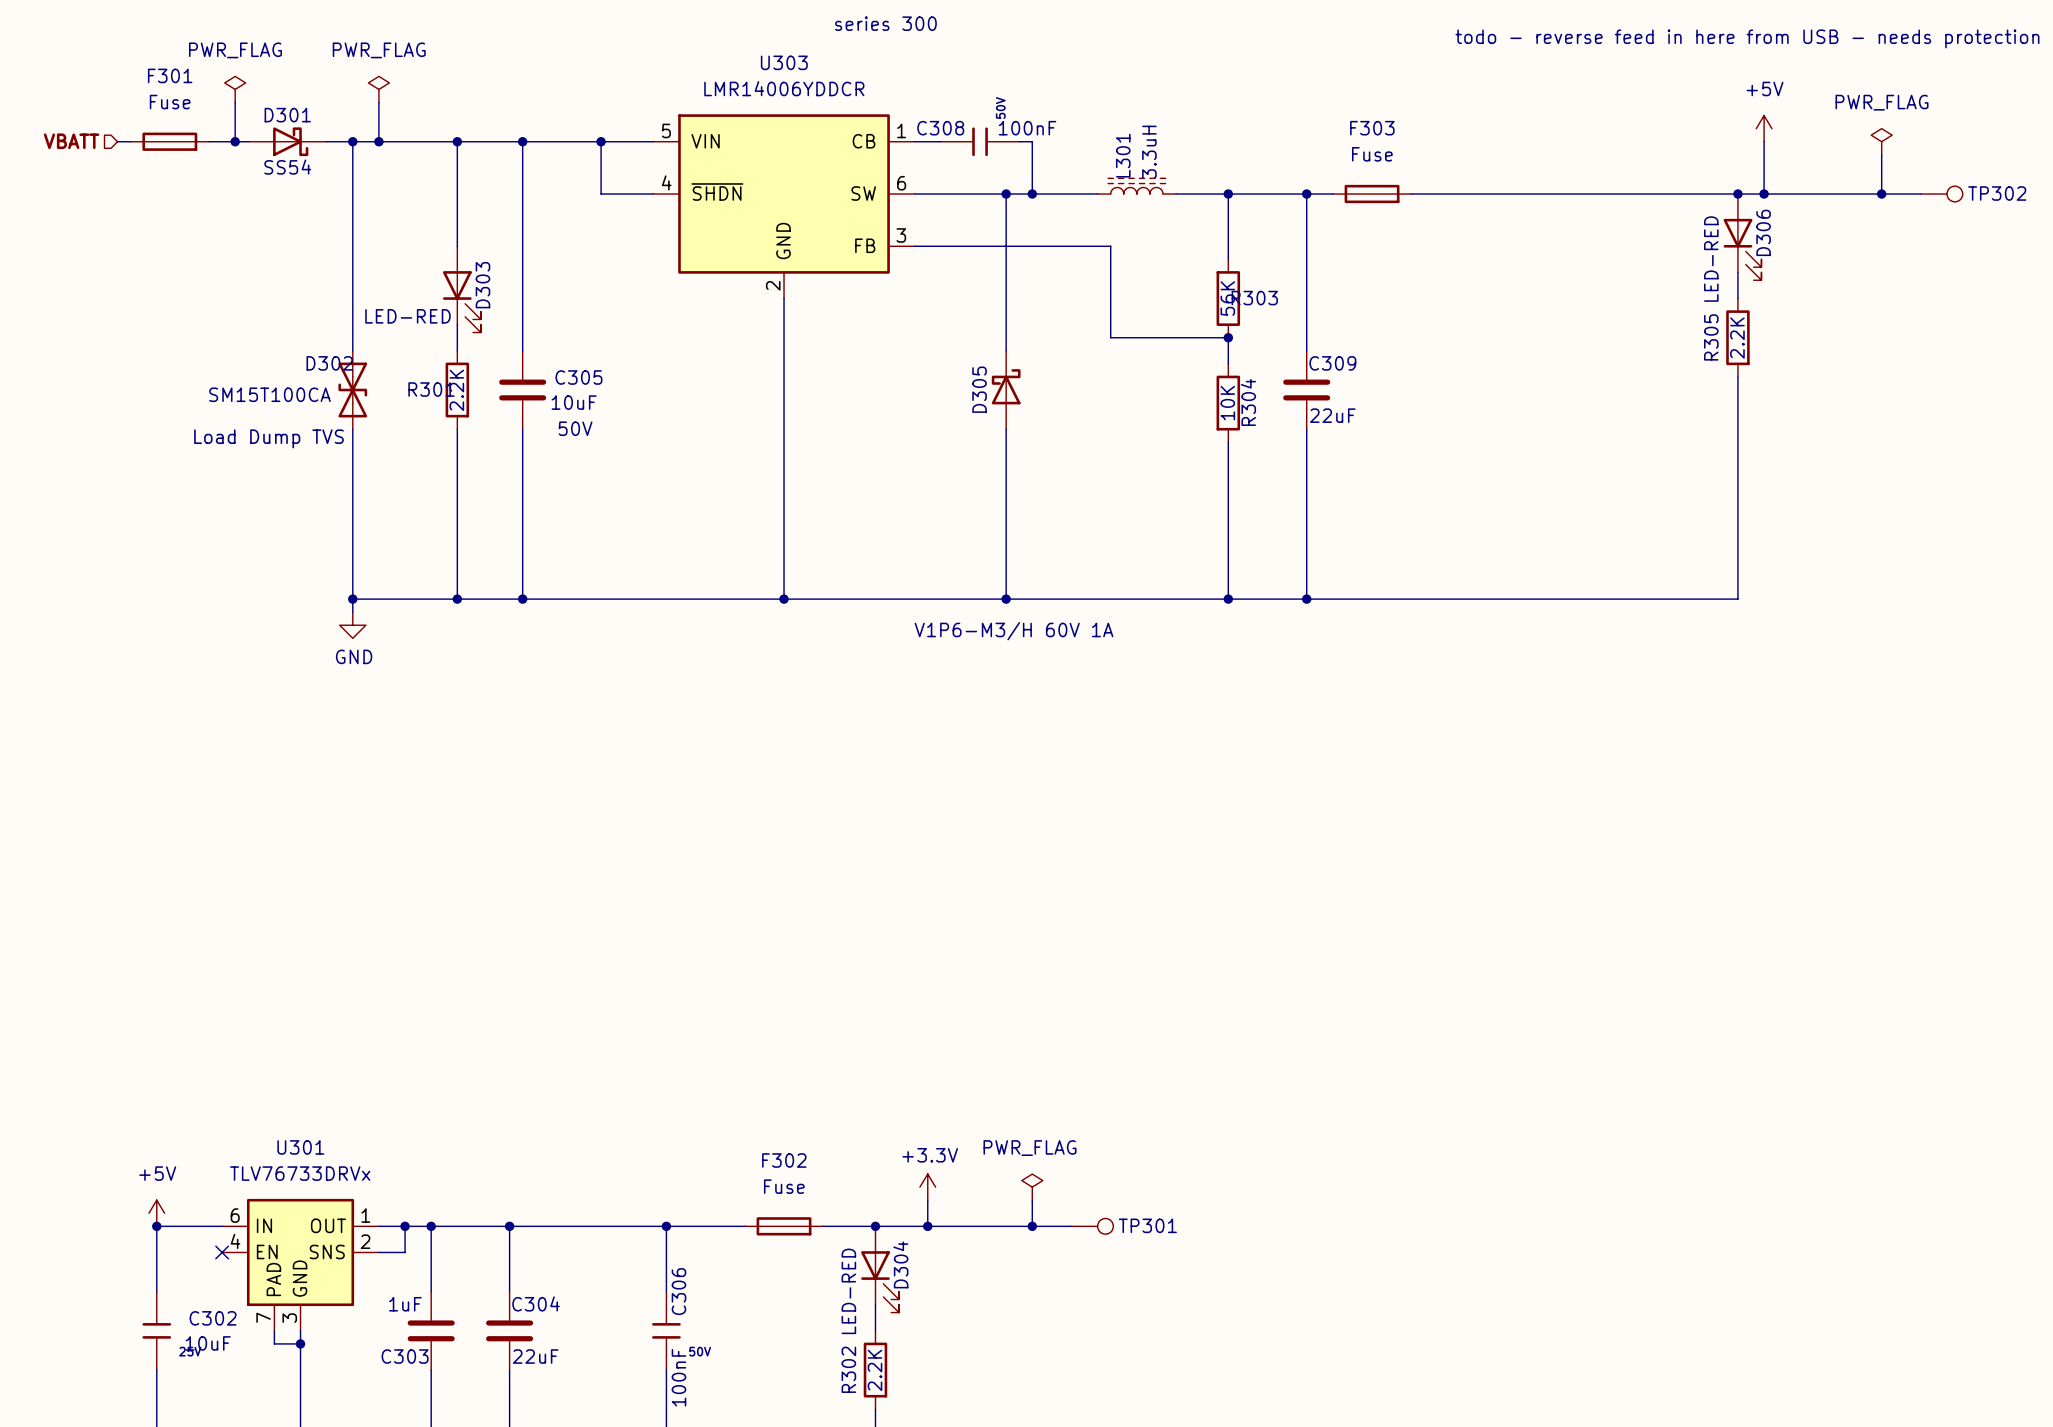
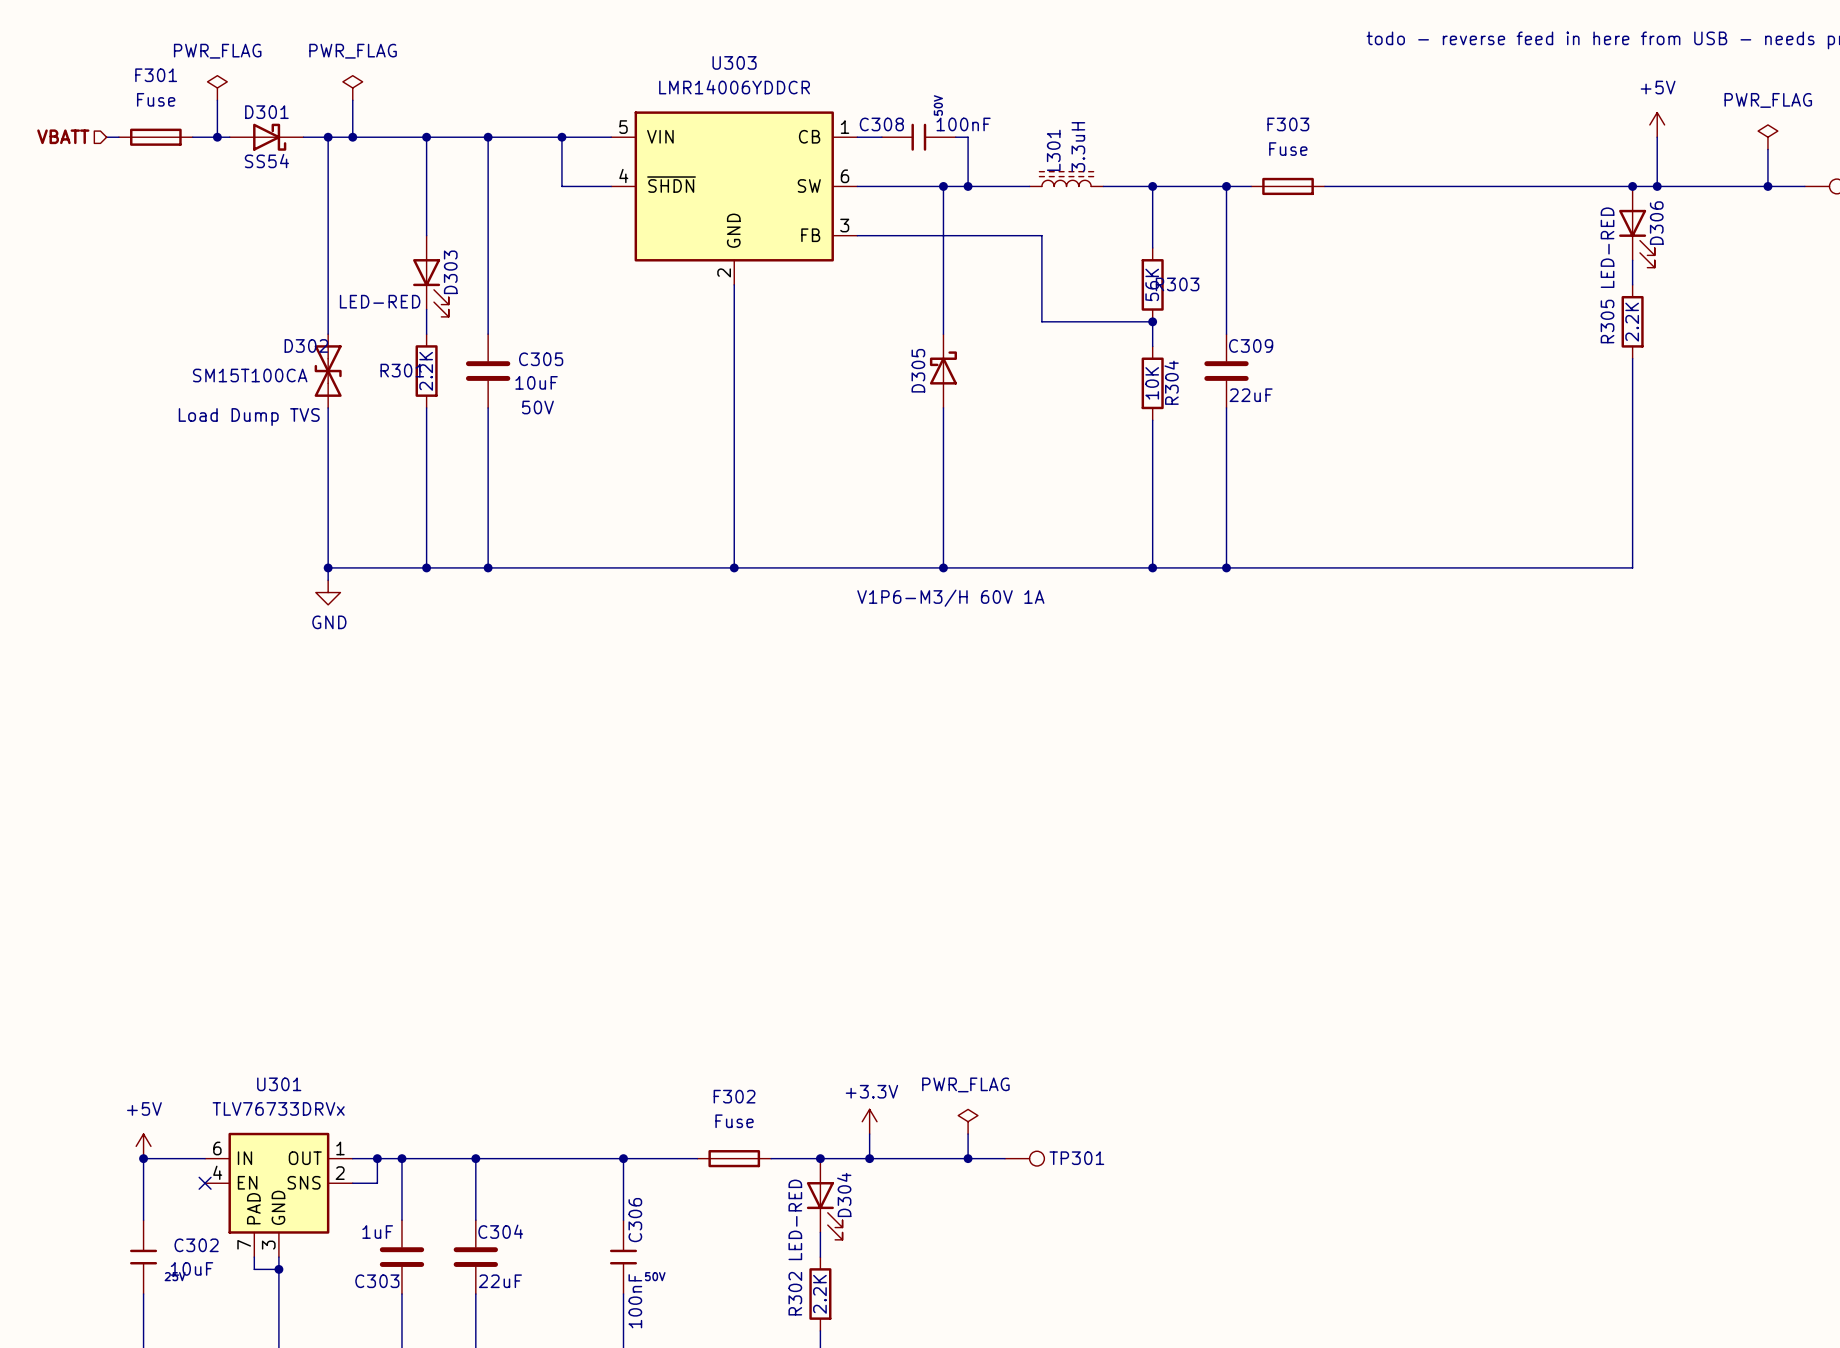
text: series 300 (885, 23) -> none

